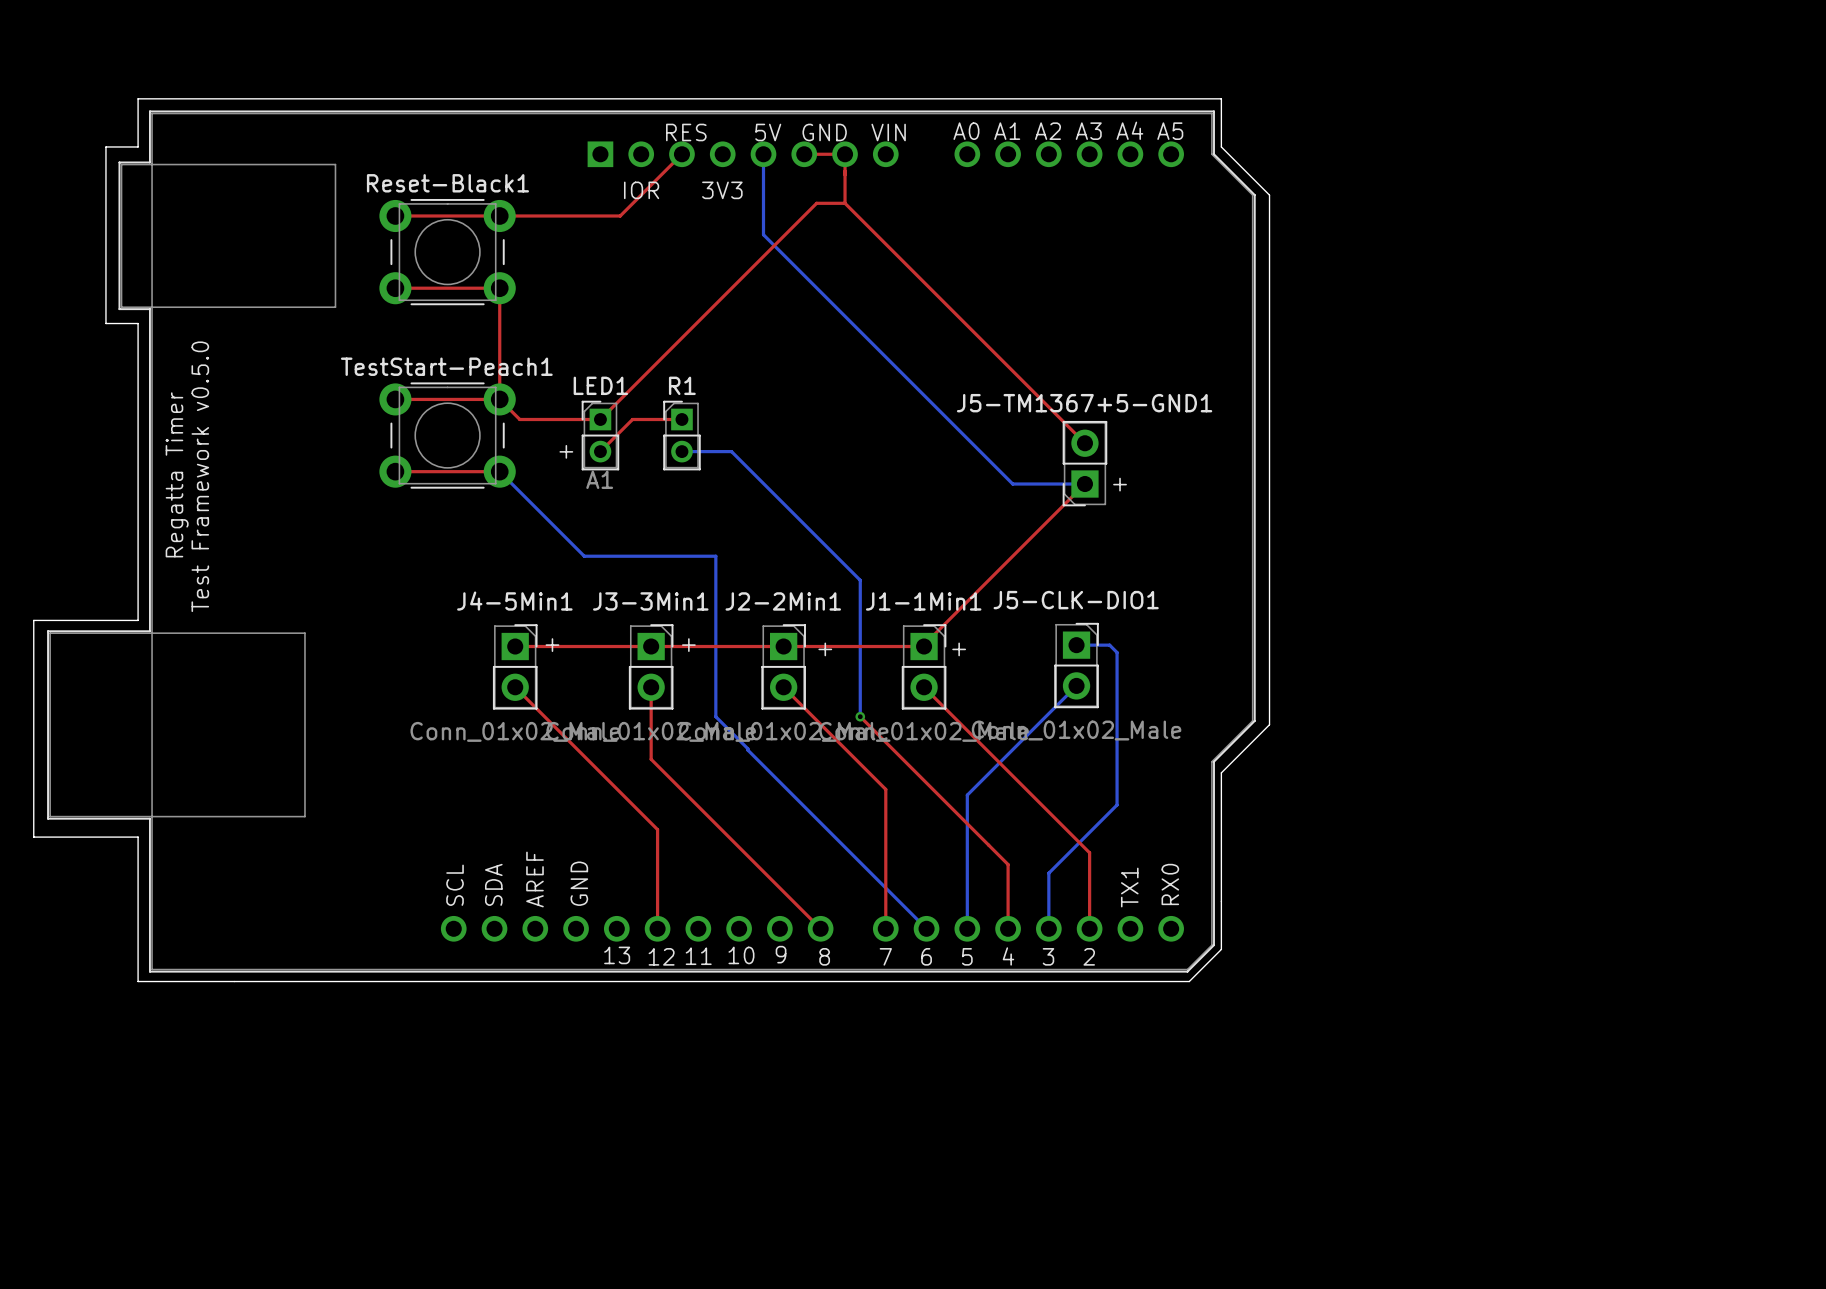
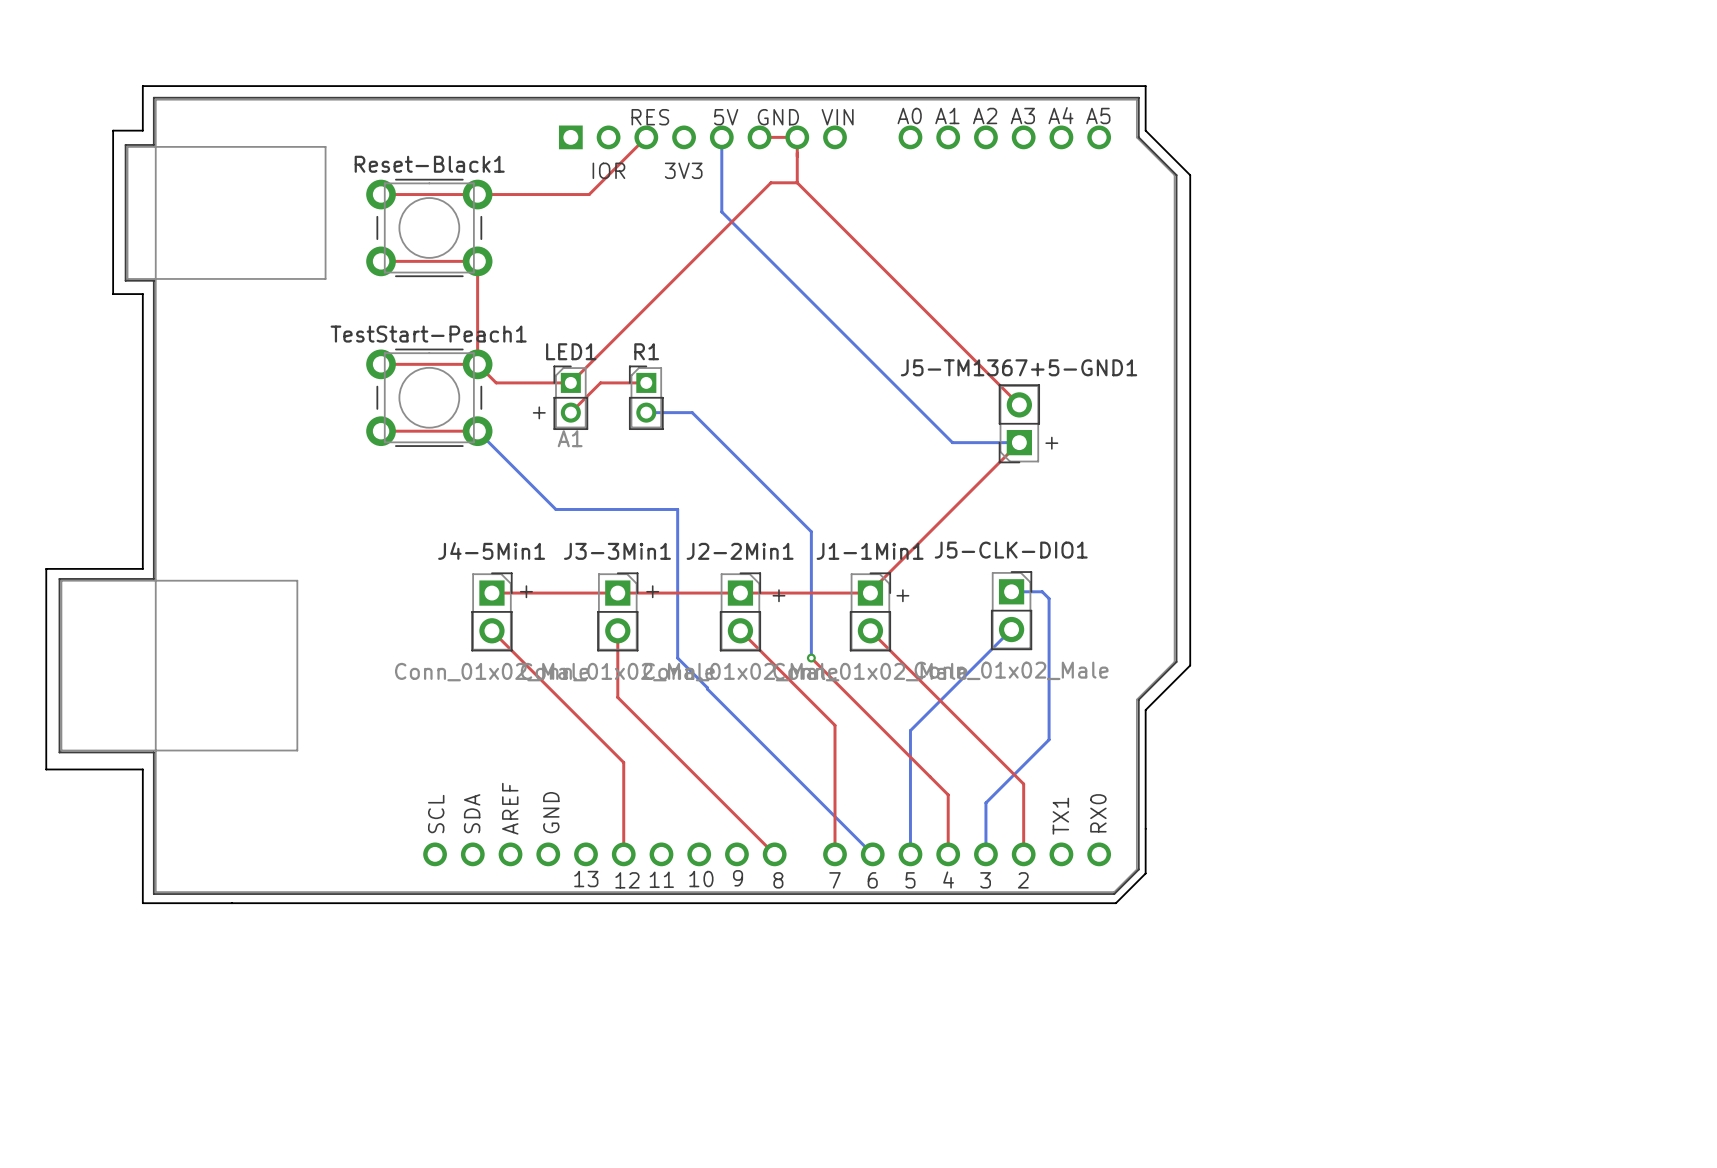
text: Regatta Timer (177, 474) -> none
text: Test Framework v0.5.0 (200, 476) -> none

